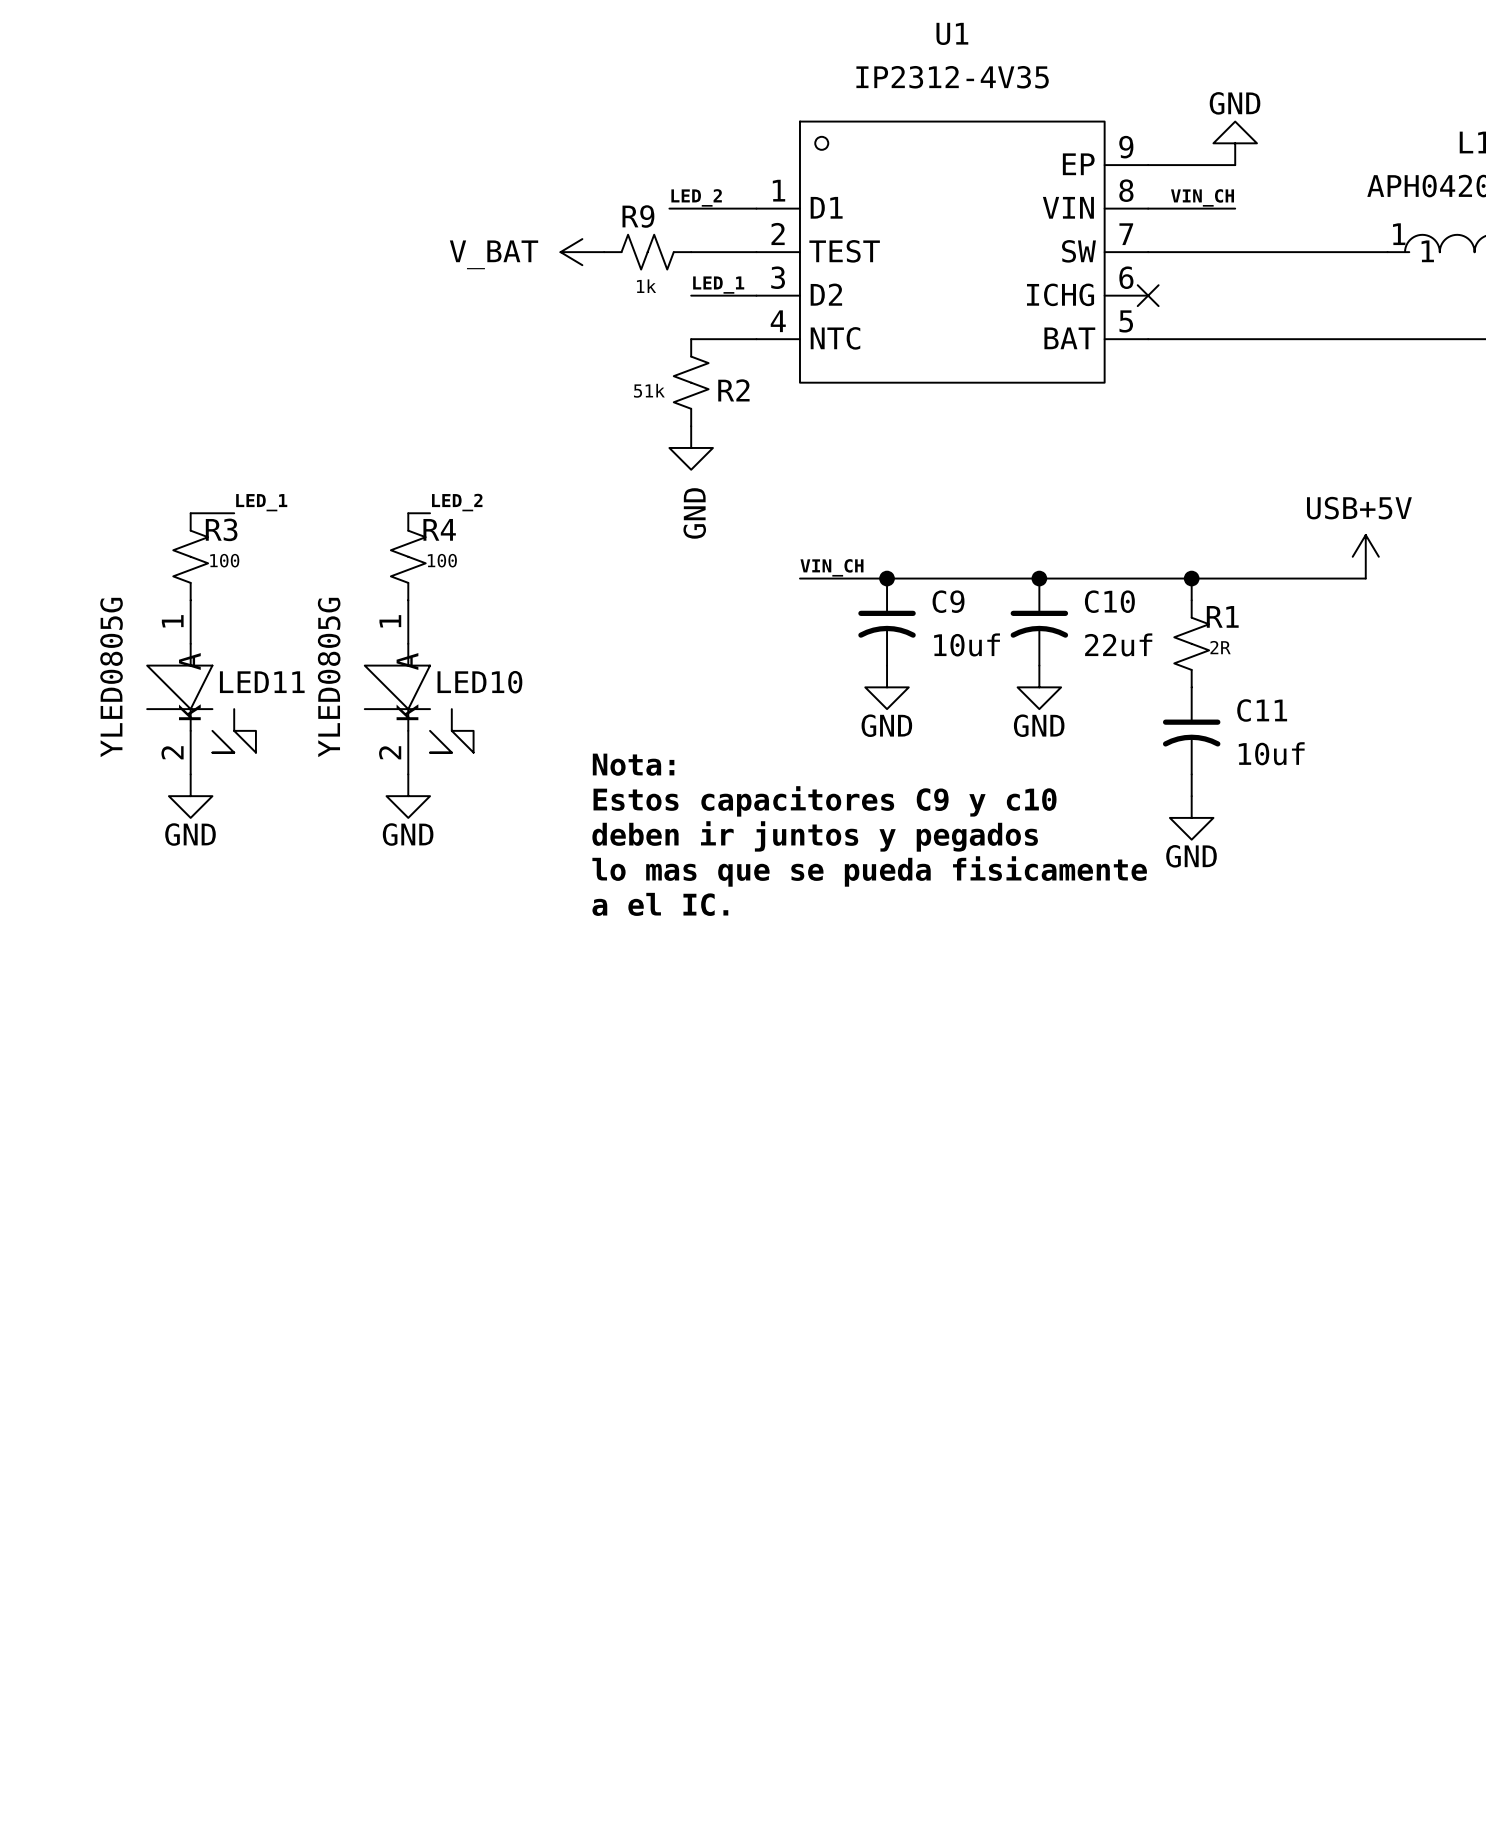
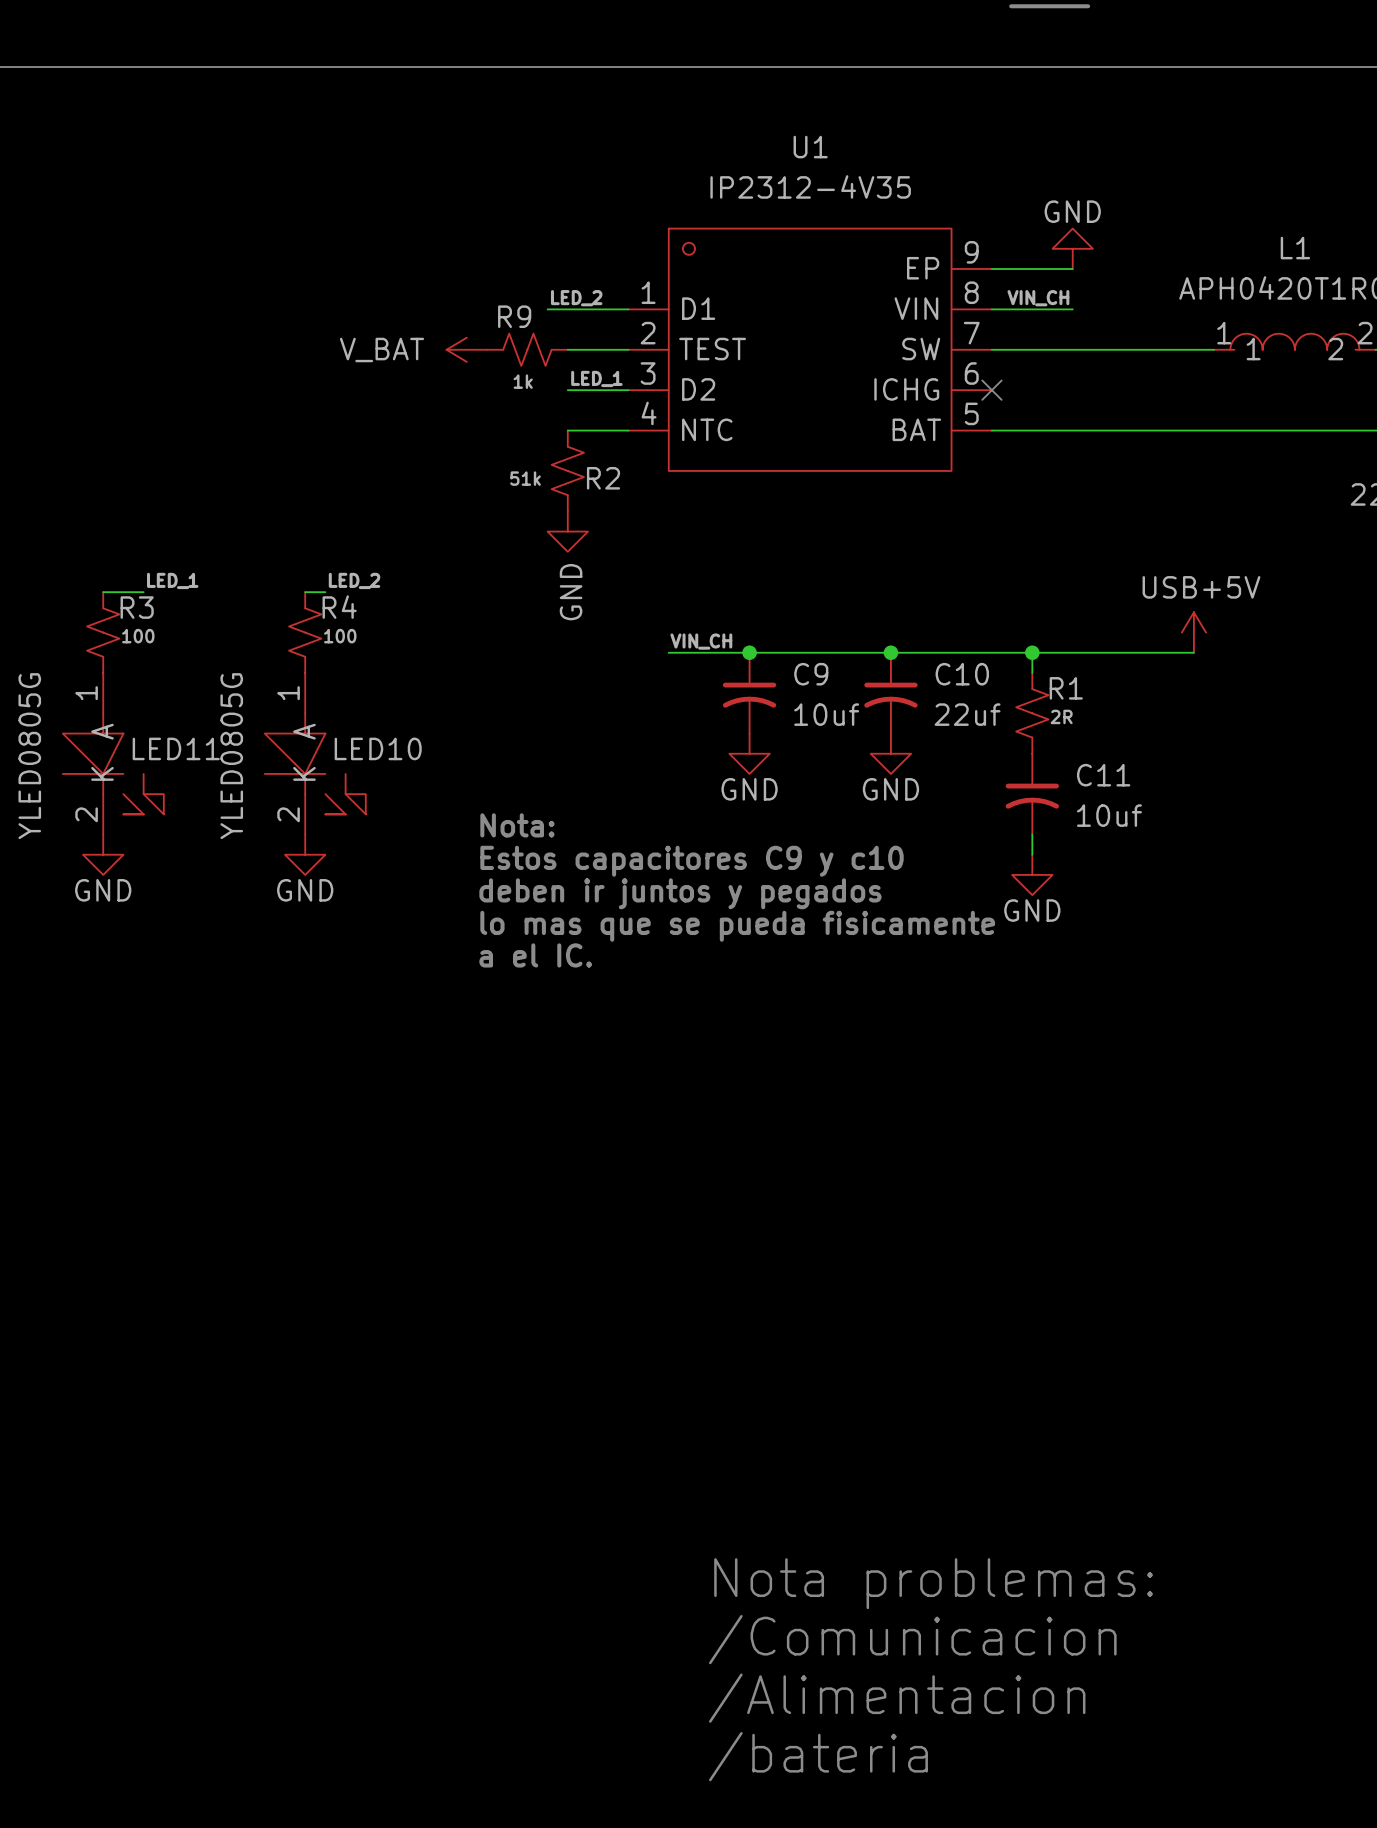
text: none -> Nota problemas: (933, 1583)
text: none -> /Comunicacion (912, 1639)
text: none -> /Alimentacion (897, 1698)
text: none -> /bateria (818, 1756)

